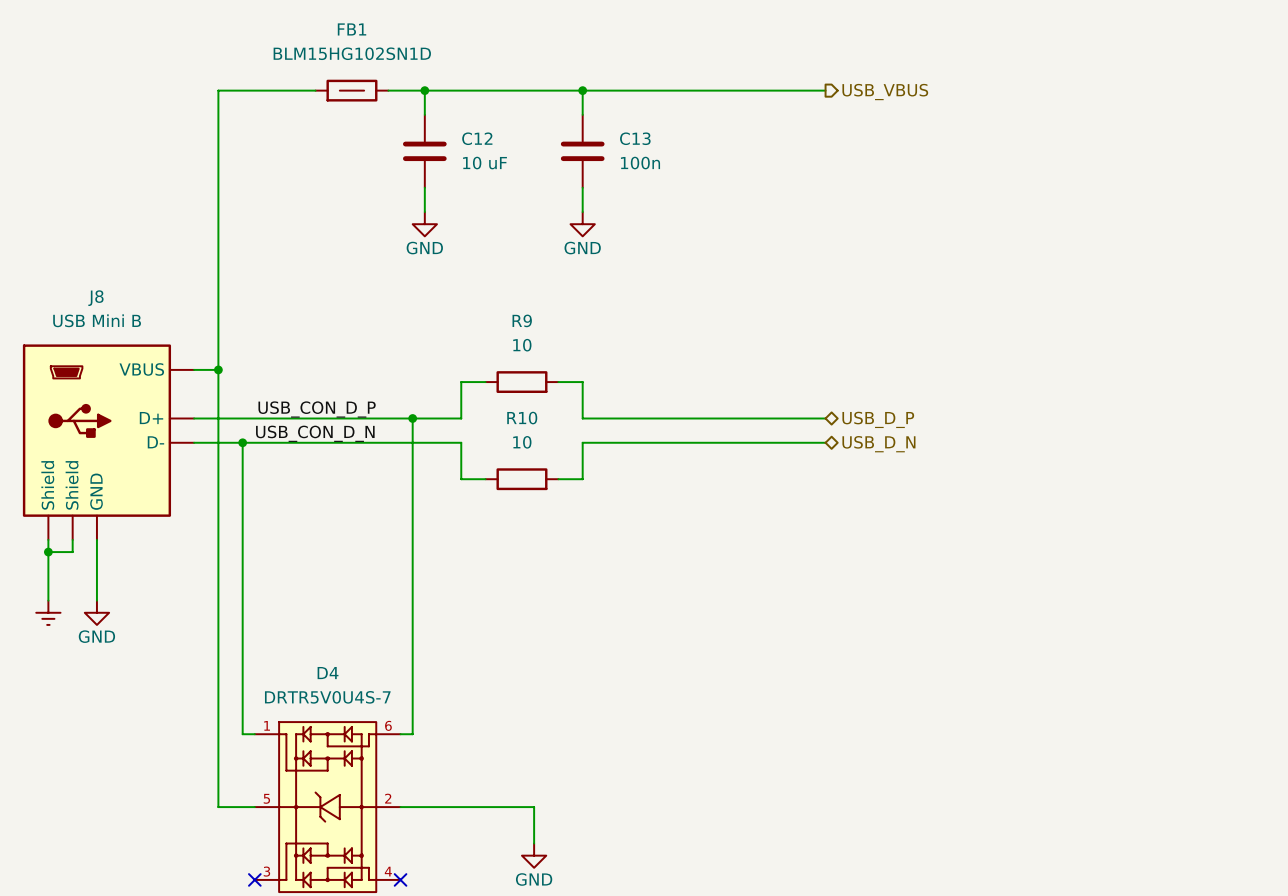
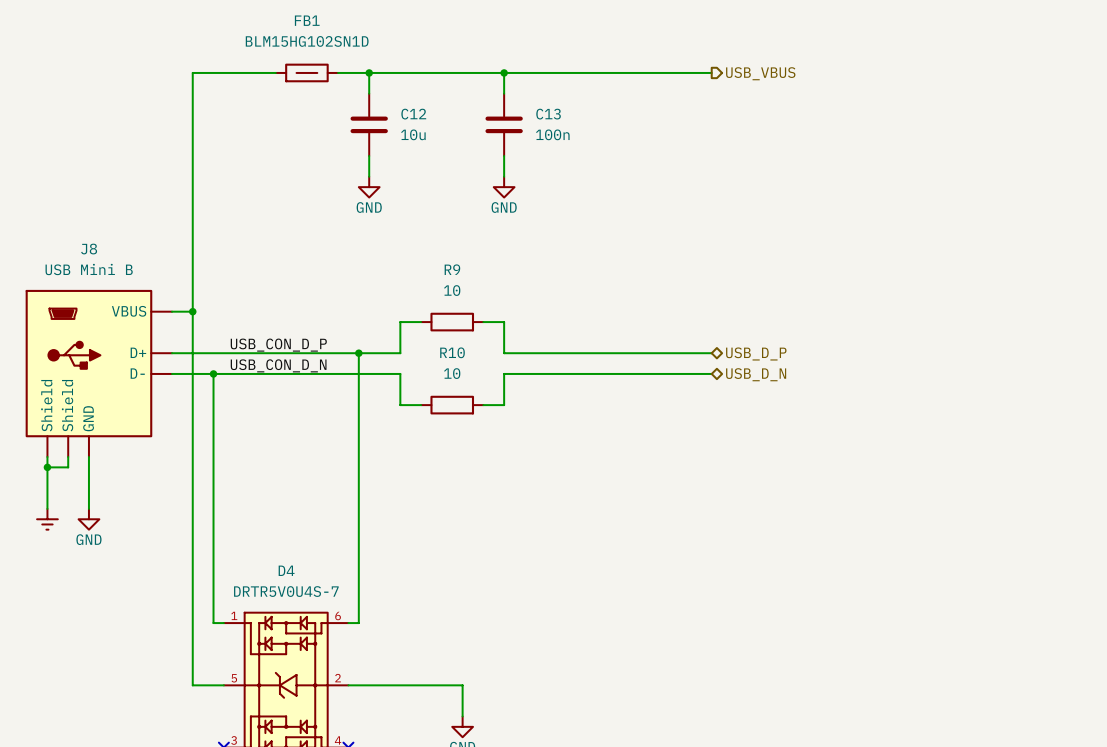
C12 text: 10 uF (485, 163) -> 10u (413, 134)

